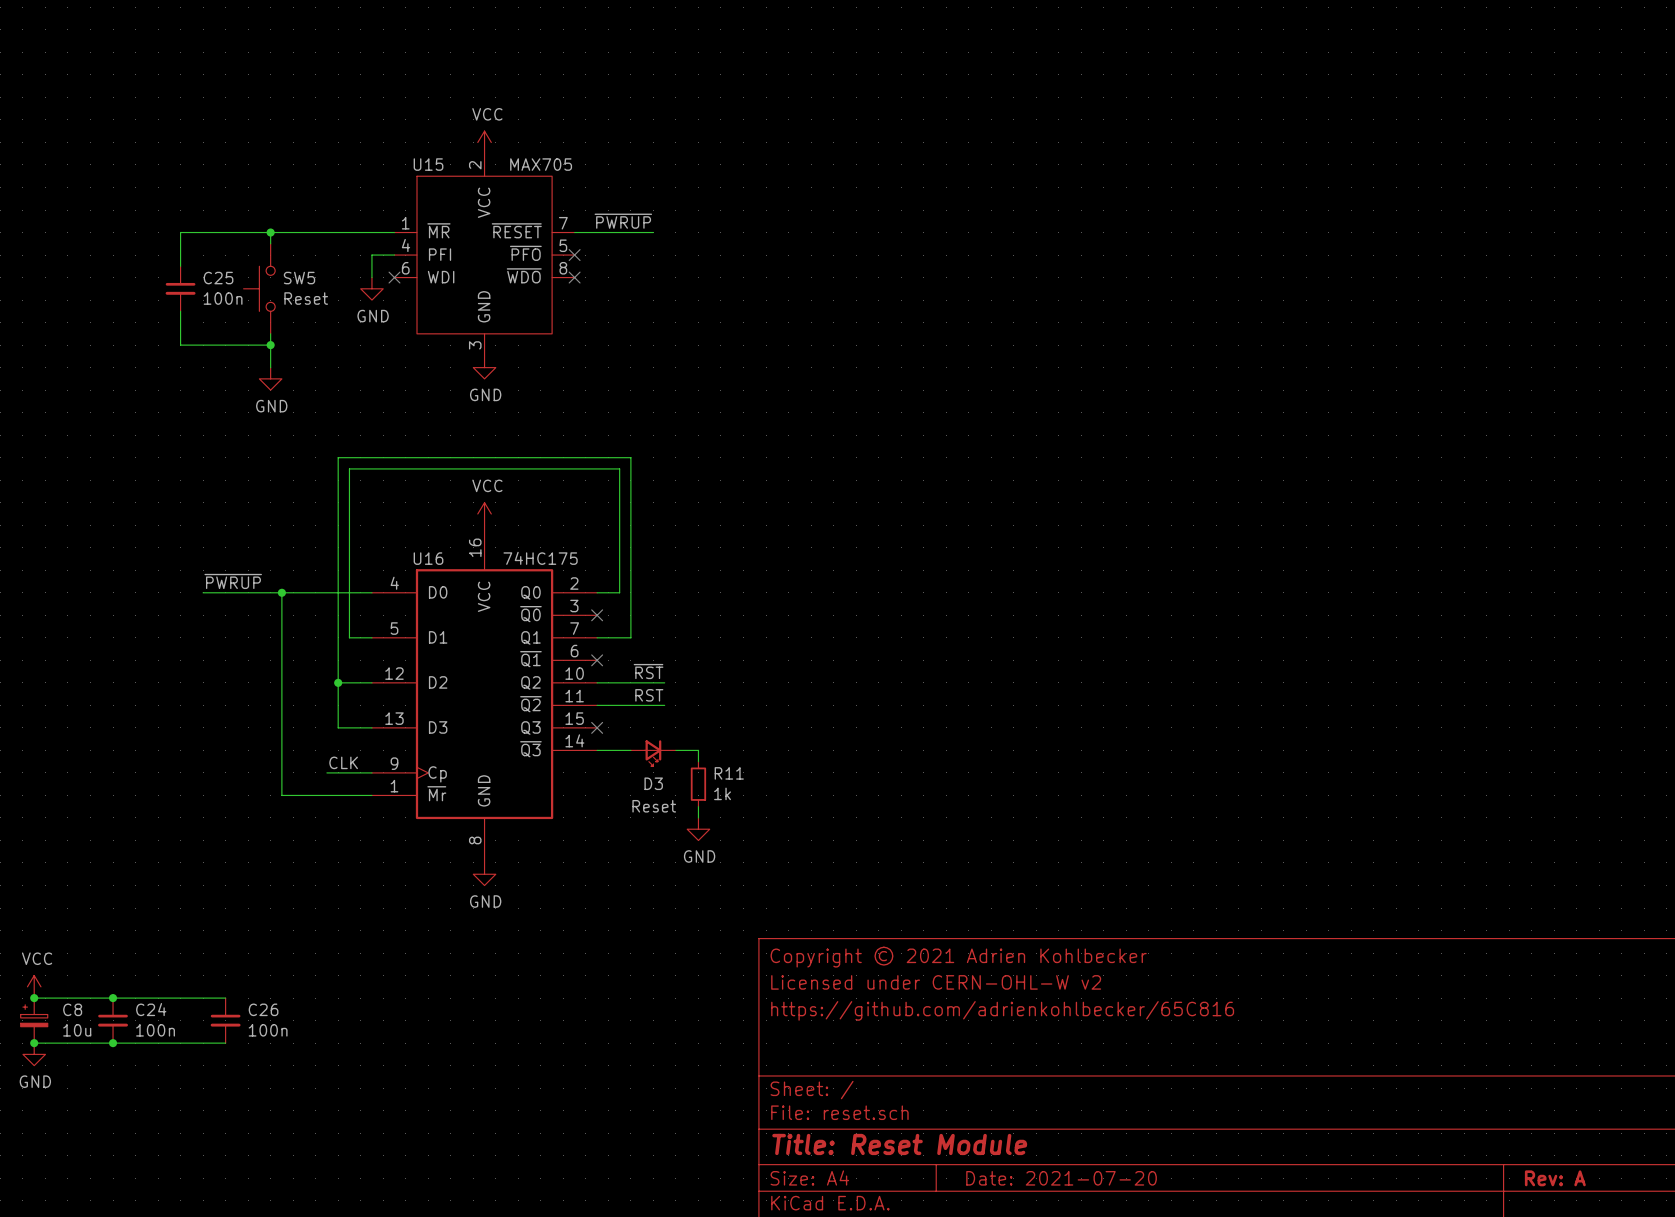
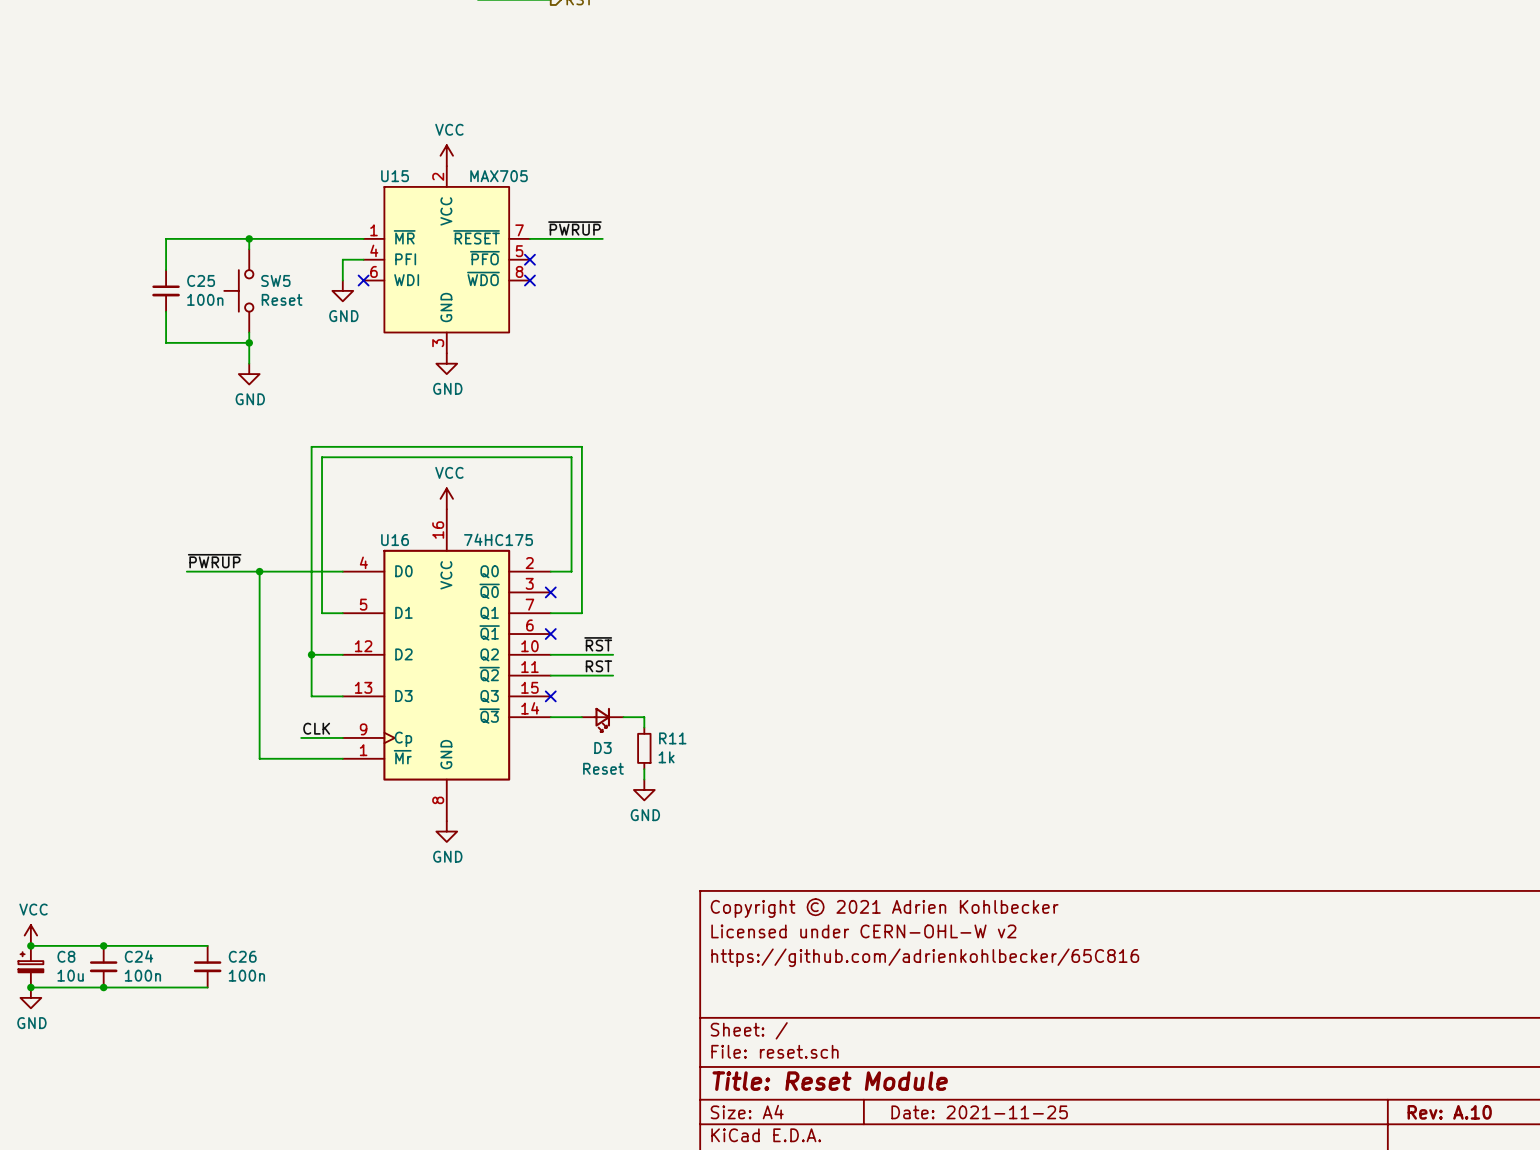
title block: Date: 2021-07-20 (1061, 1178) -> Date: 2021-11-25 (979, 1112)
title block: Rev: A (1555, 1178) -> Rev: A.10 (1449, 1112)

